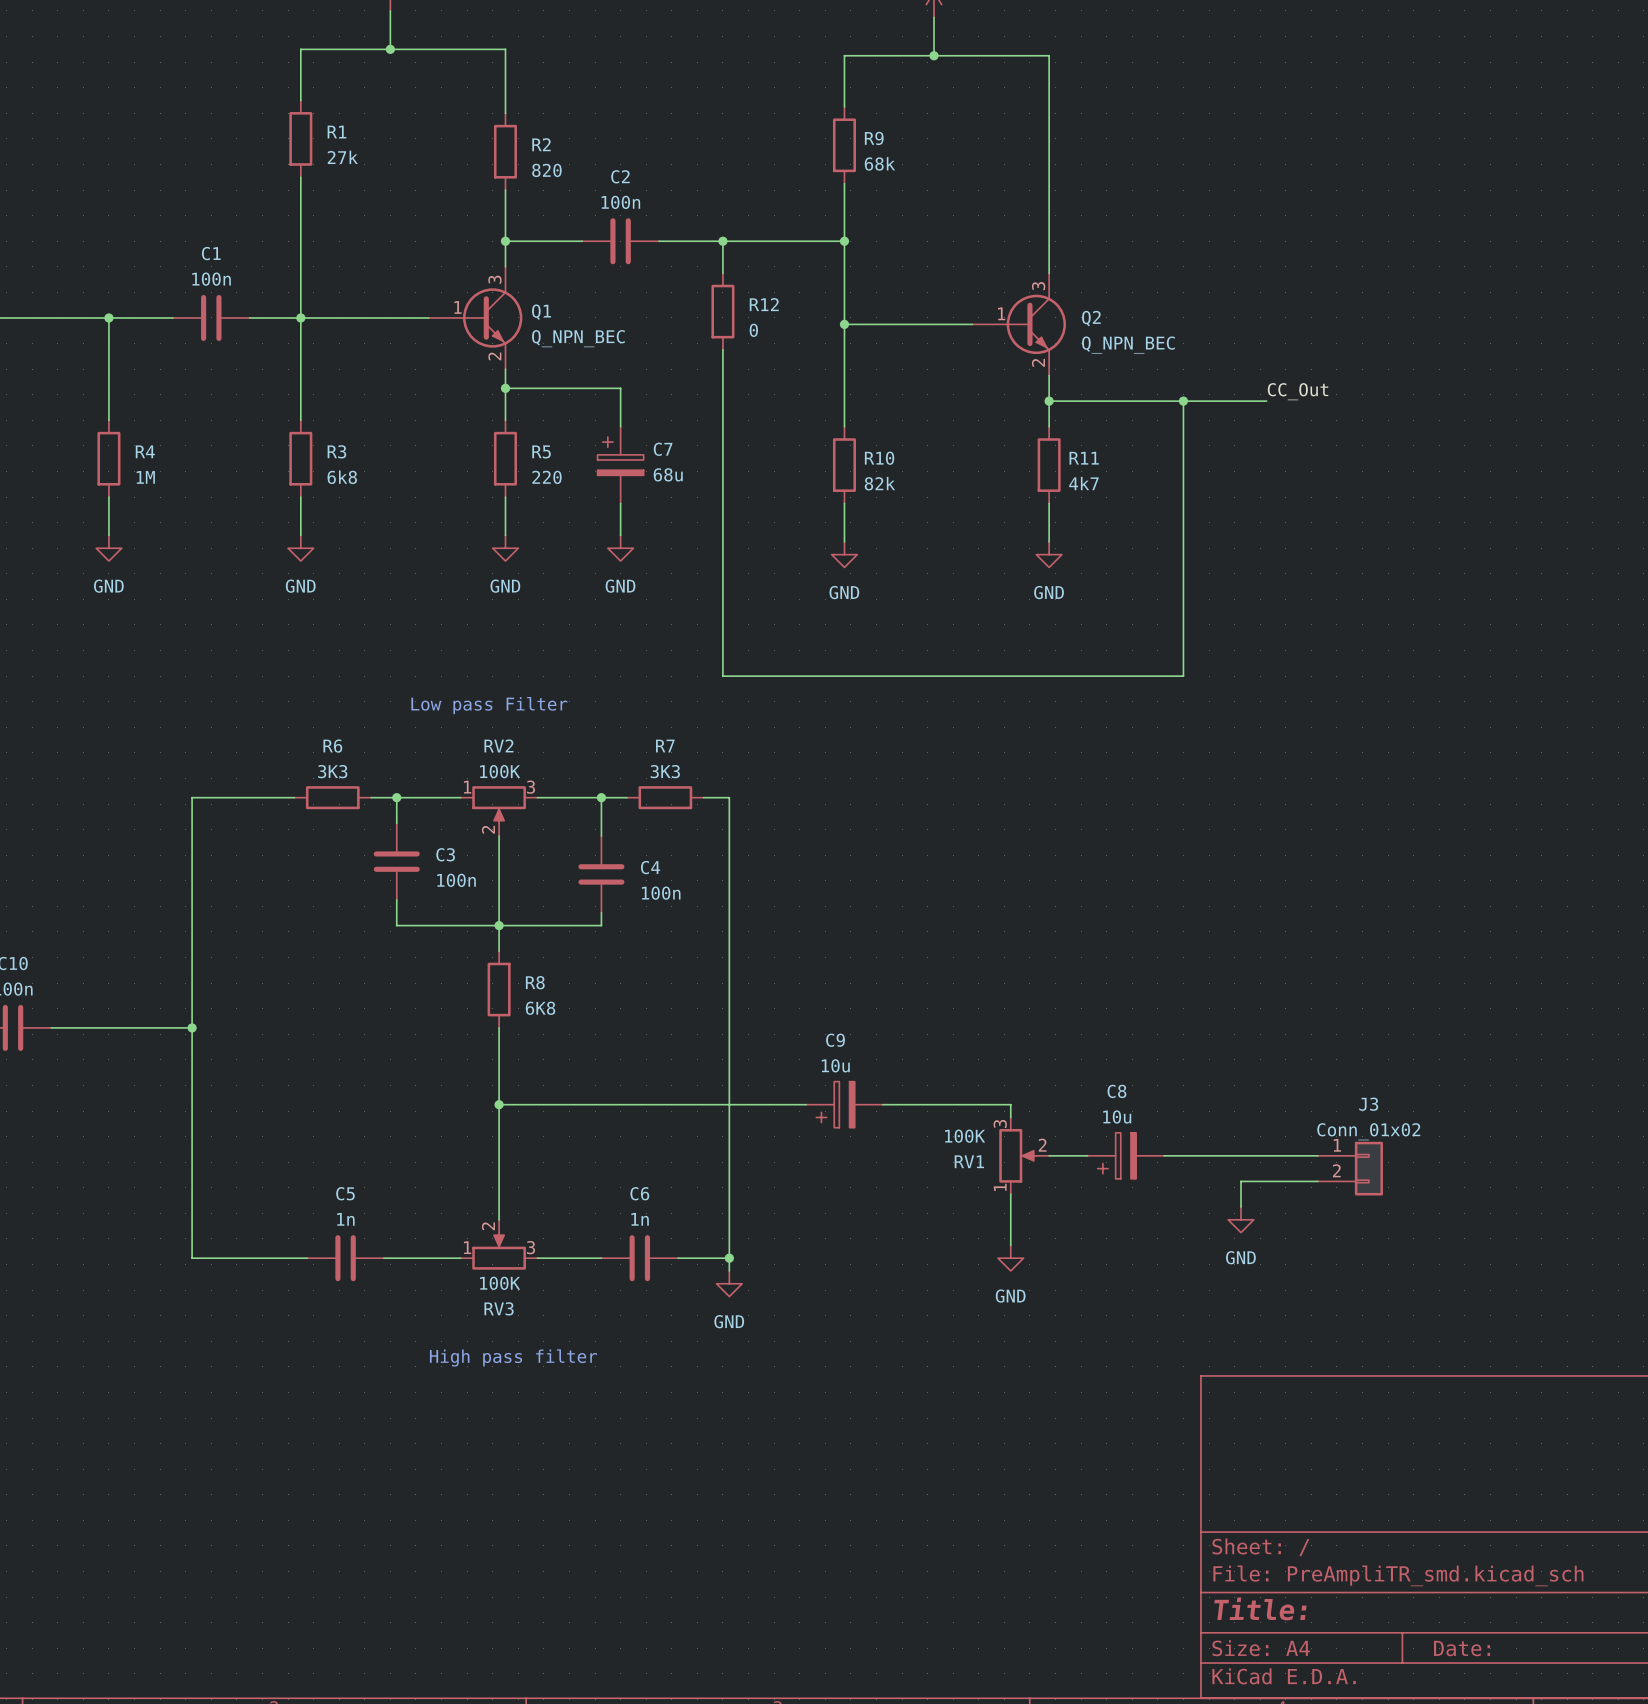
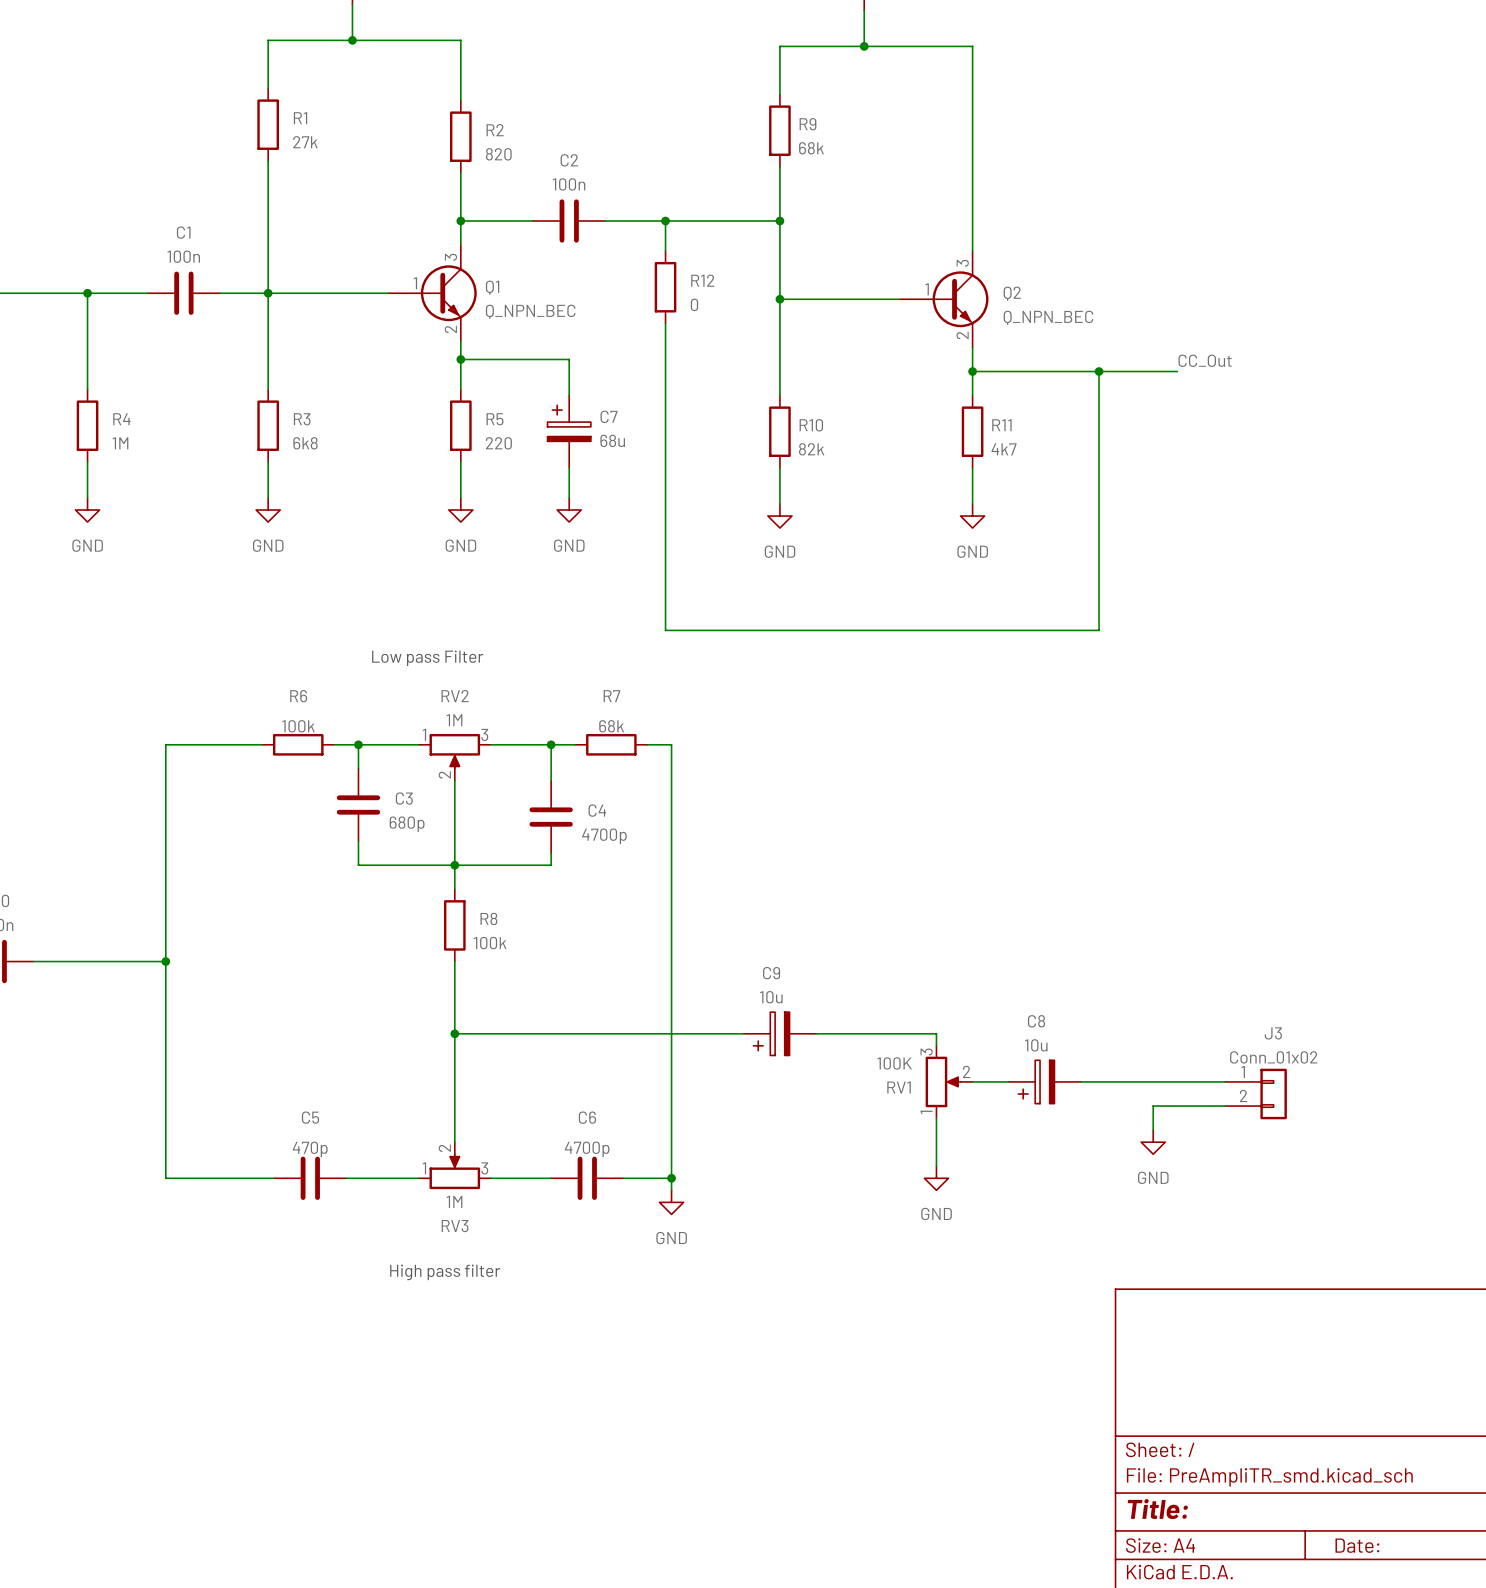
R6 value: 3K3 (332, 771) -> 100k (298, 726)
RV2 value: 100K (500, 771) -> 1M (454, 720)
R7 value: 3K3 (665, 771) -> 68k (611, 726)
C3 value: 100n (456, 880) -> 680p (407, 824)
C4 value: 100n (661, 893) -> 4700p (604, 836)
R8 value: 6K8 (540, 1008) -> 100k (490, 943)
C5 value: 1n (345, 1219) -> 470p (310, 1149)
C6 value: 1n (640, 1219) -> 4700p (587, 1149)
RV3 value: 100K (500, 1283) -> 1M (454, 1201)

